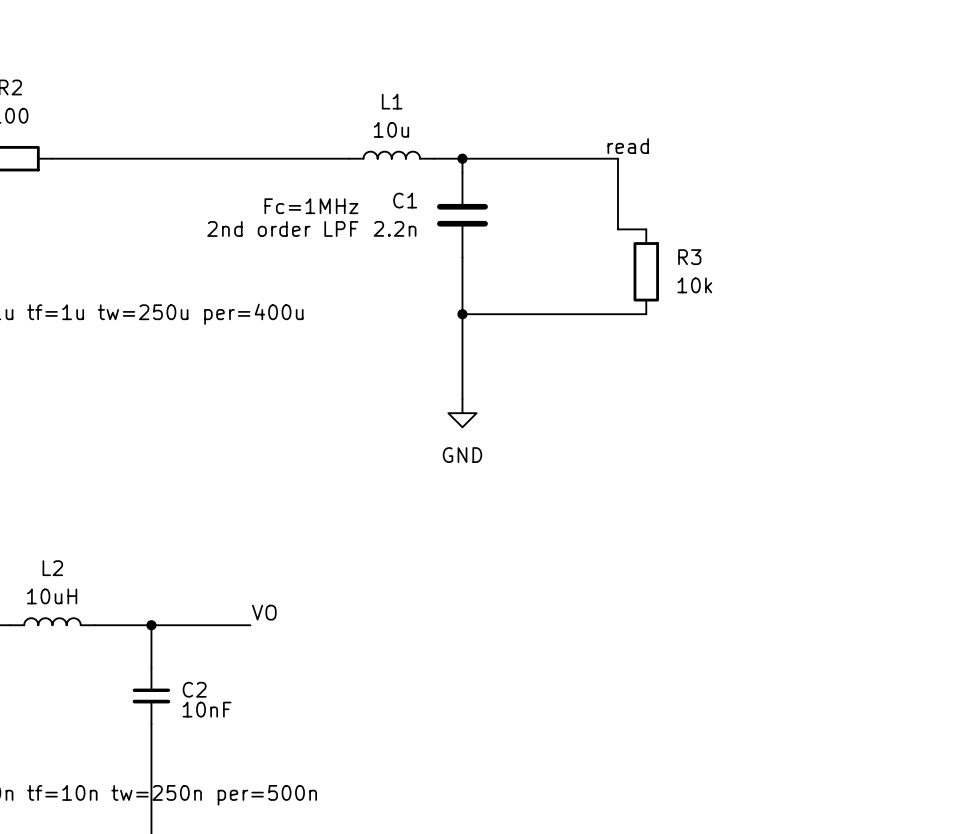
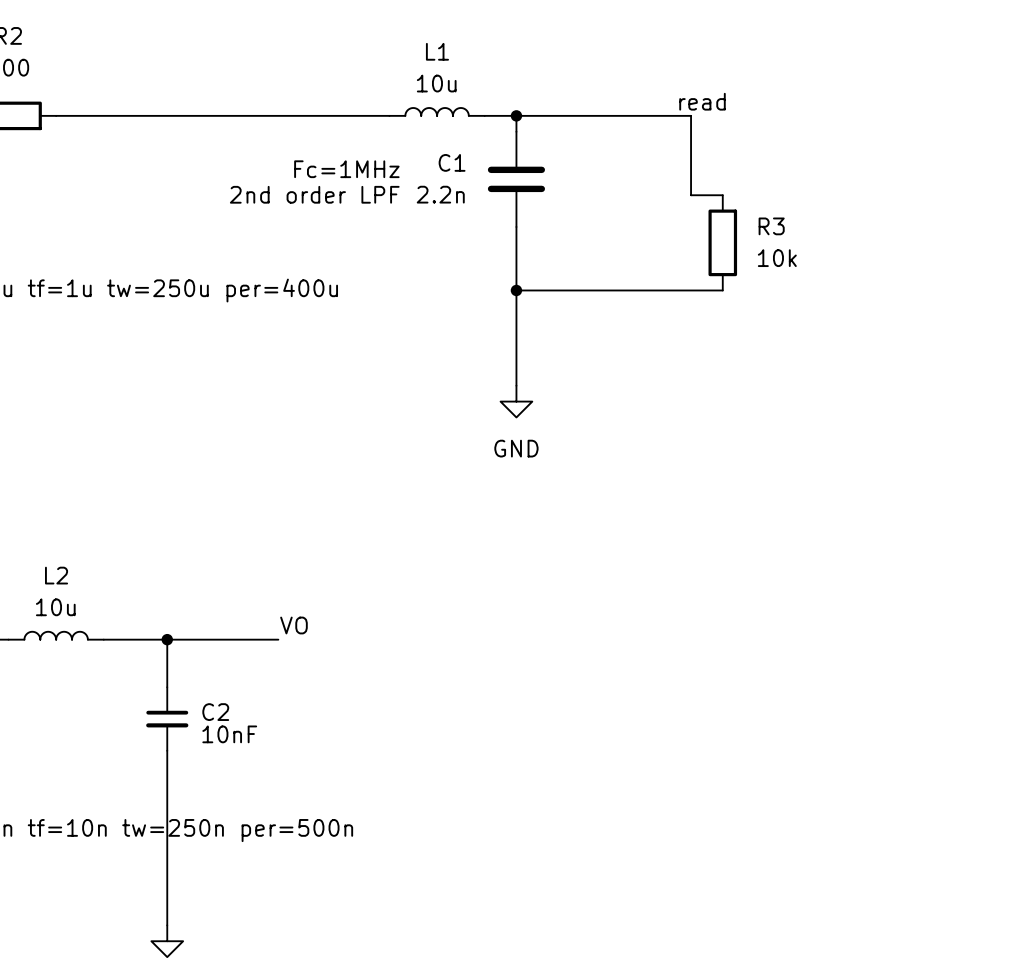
L2 value: 10uH (52, 596) -> 10u (55, 607)

